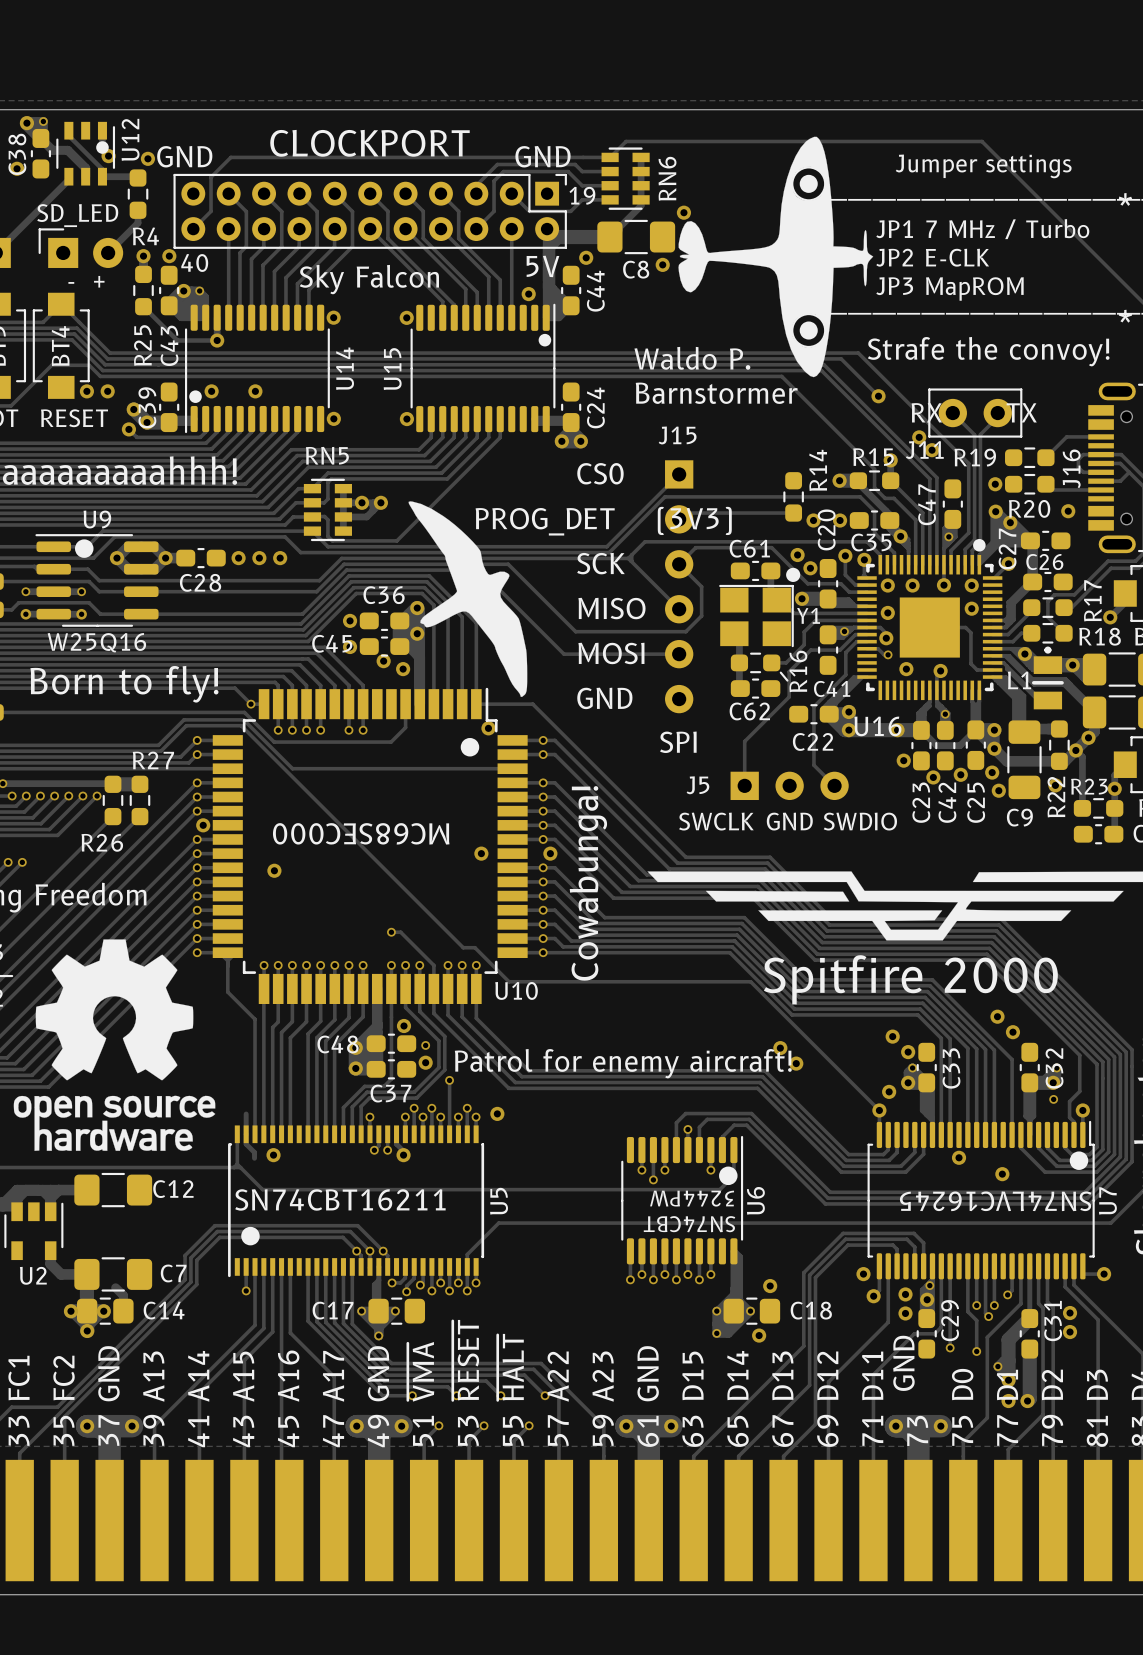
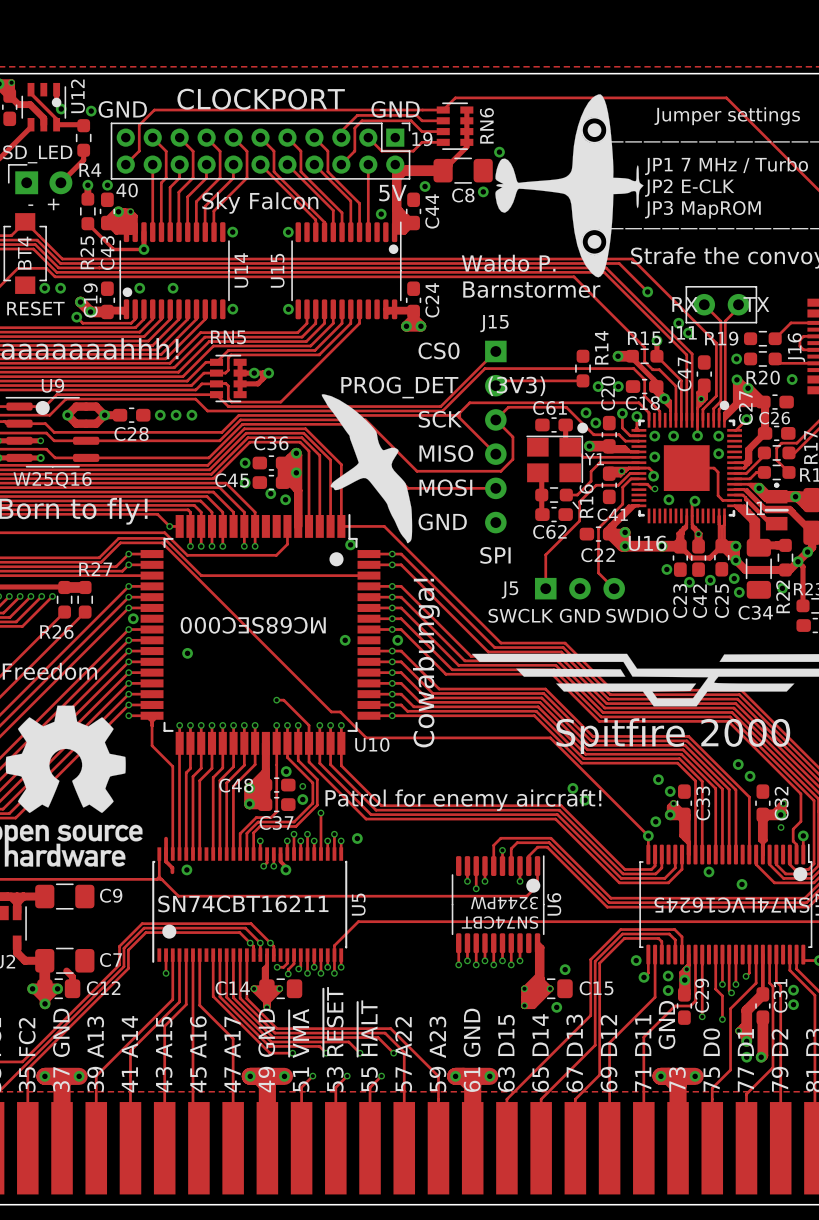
C39 name: C39 (147, 407) -> C19 (90, 300)
C35 name: C35 (871, 542) -> C18 (642, 403)
drawing position: (467, 599) -> (366, 468)
C9 name: C9 (1019, 817) -> C34 (755, 612)
C12 name: C12 (173, 1189) -> C9 (111, 895)
C14 name: C14 (164, 1310) -> C12 (103, 988)
C17 name: C17 (333, 1310) -> C14 (232, 988)
C18 name: C18 (811, 1310) -> C15 (596, 988)

